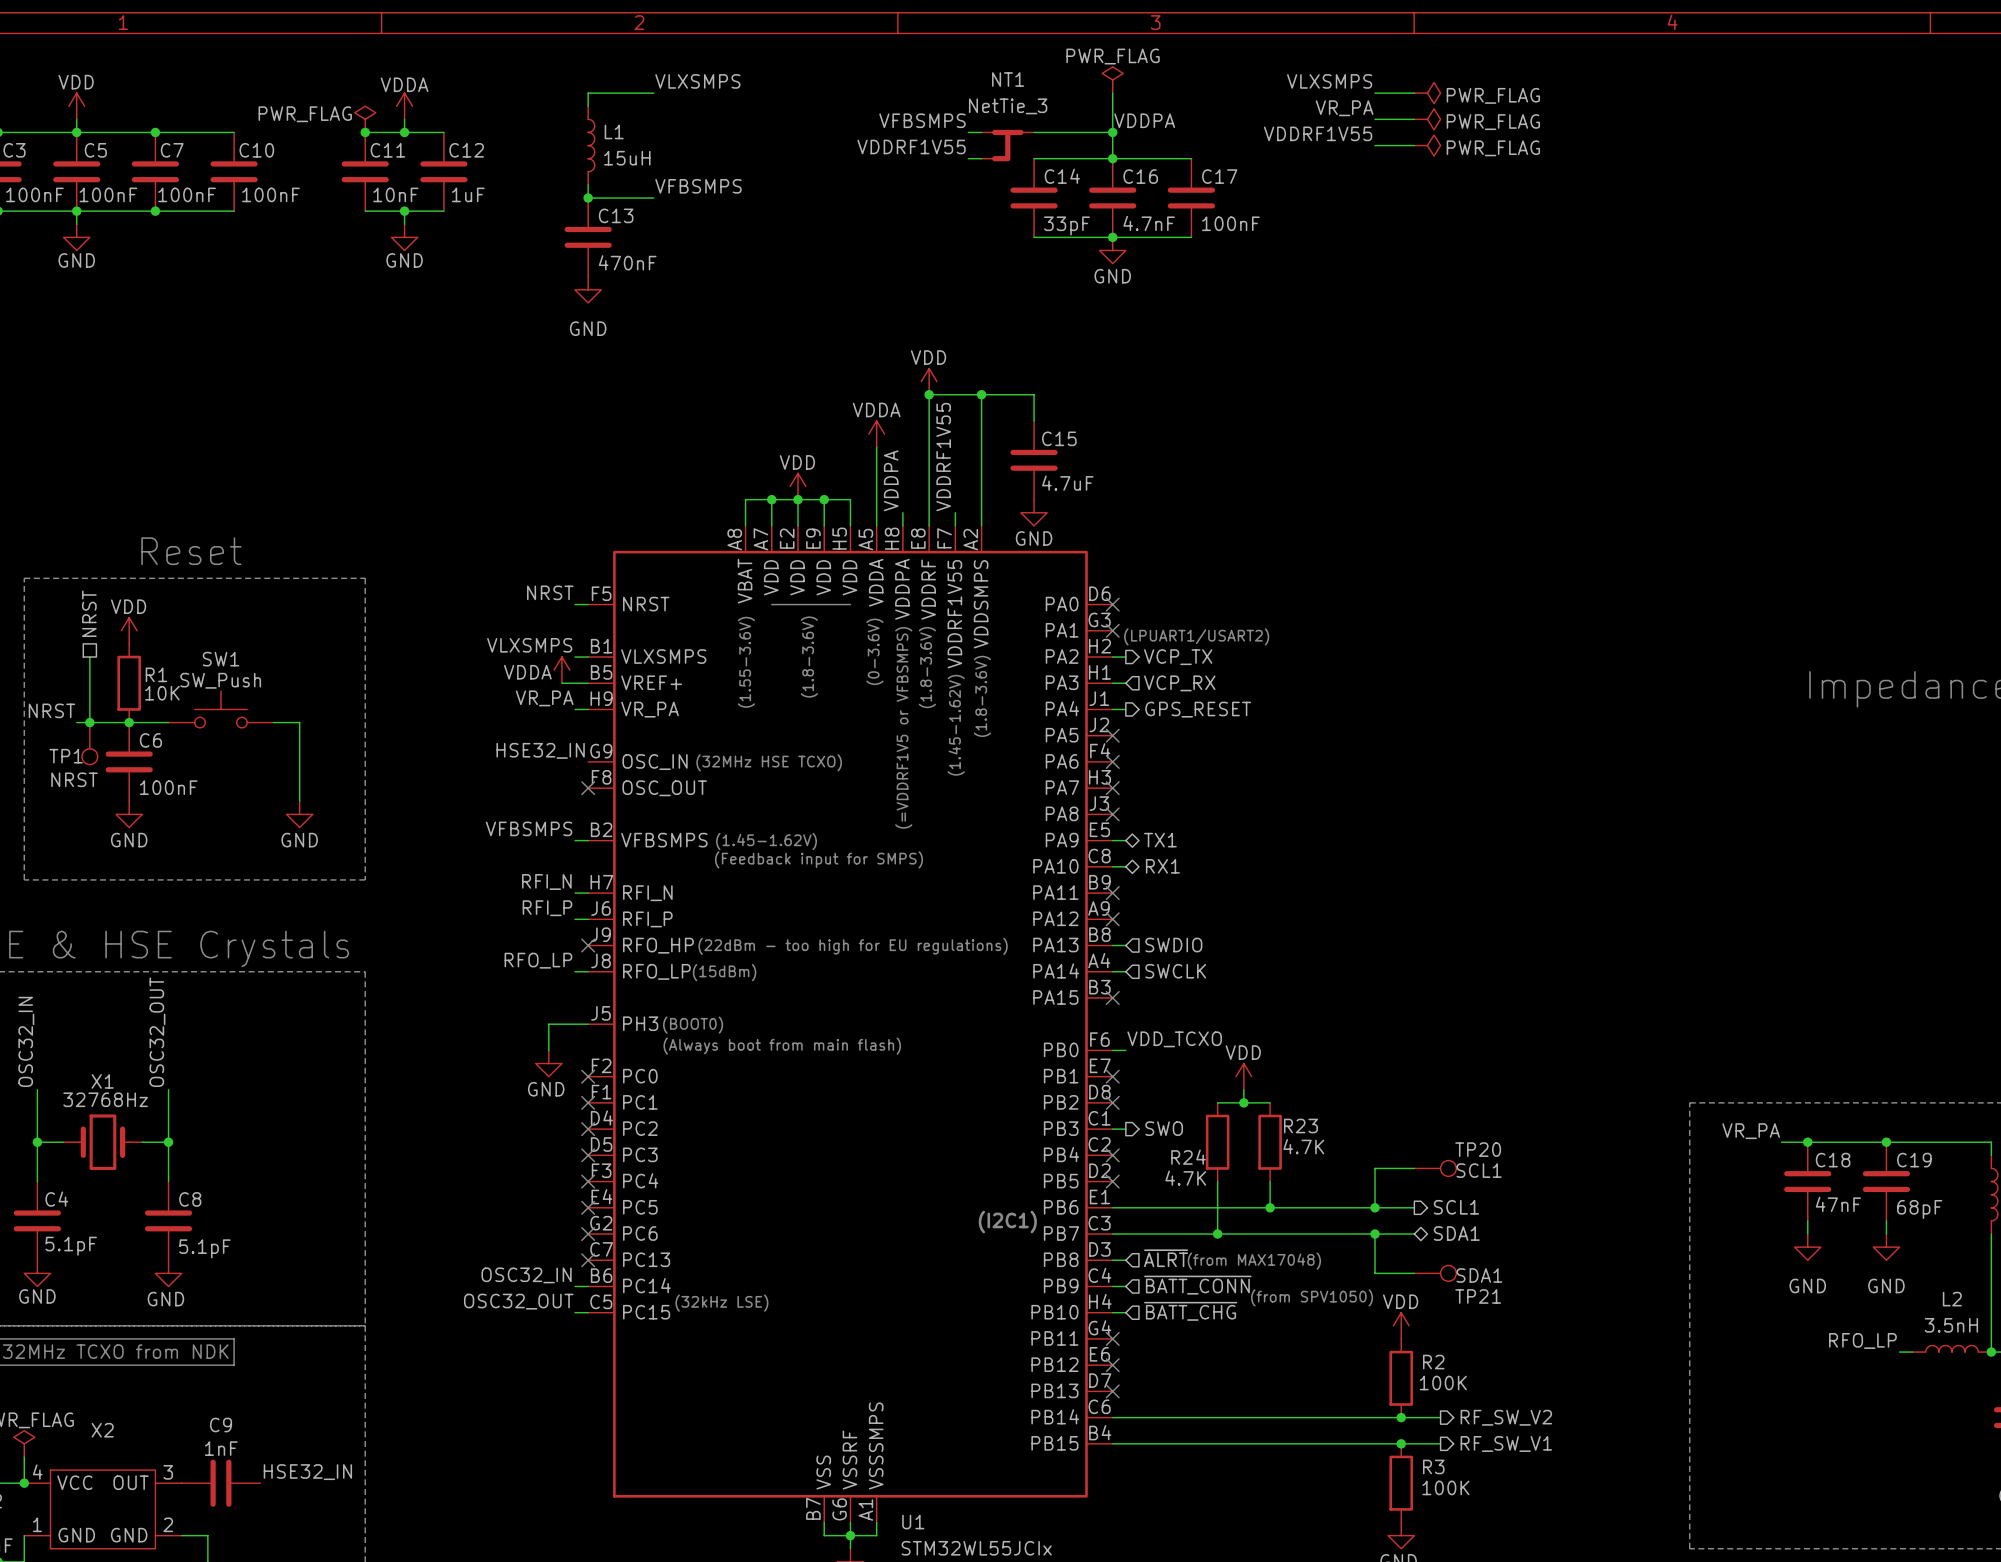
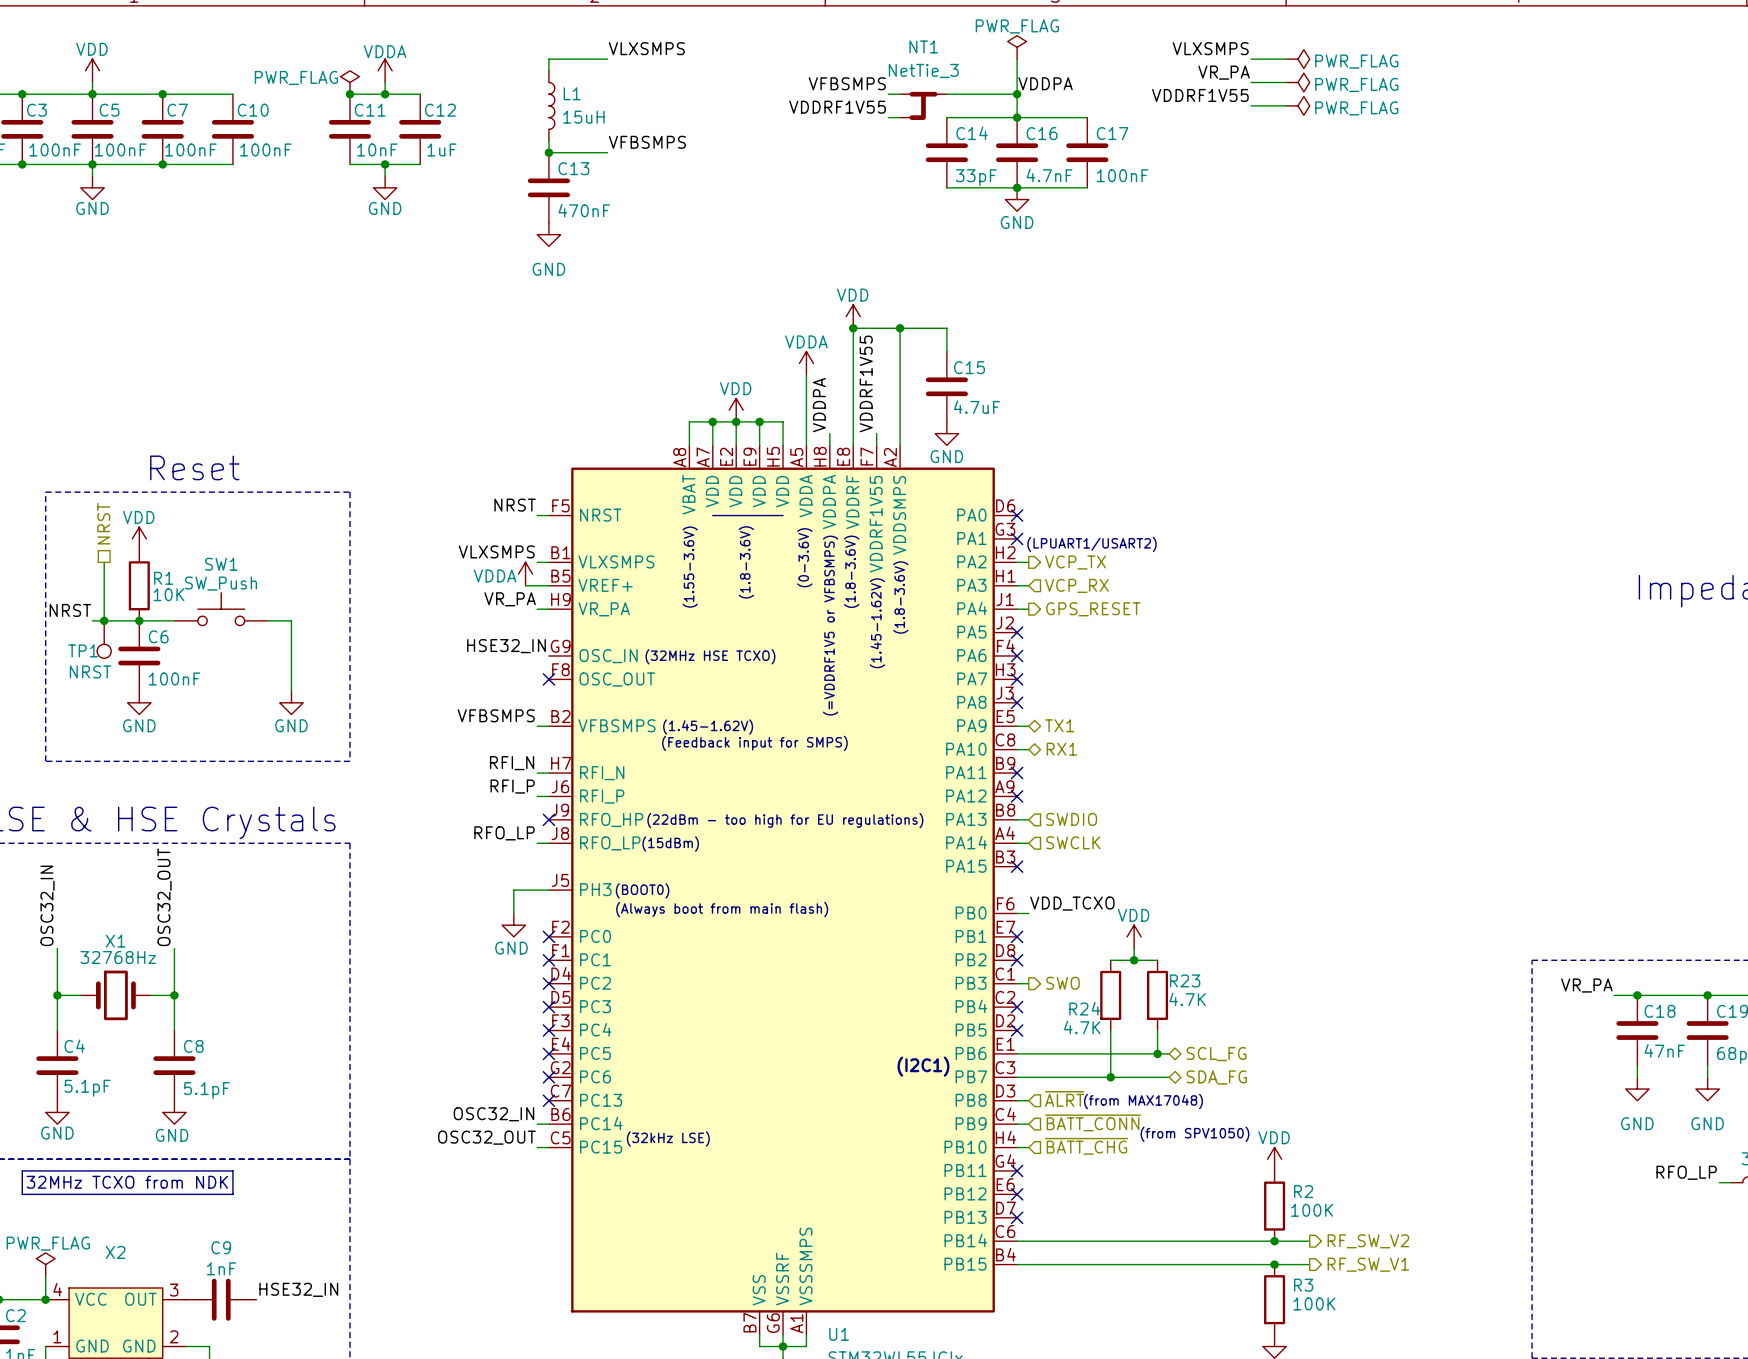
wire: (1414, 1168) (1375, 1168) (1375, 1207) -> none
TP20: SCL1 (1435, 1168) -> none
wire: (1283, 1207) (1414, 1207) -> none
hierarchical label: none -> SCL_FG (1216, 1054)
junction: (1375, 1207) -> none
hierarchical label: SCL1 (1456, 1207) -> none
hierarchical label: SDA1 (1456, 1233) -> none
wire: (1283, 1234) (1414, 1234) -> none
hierarchical label: none -> SDA_FG (1216, 1077)
wire: (1375, 1234) (1375, 1273) (1414, 1273) -> none
junction: (1375, 1234) -> none
TP21: SDA1 (1435, 1273) -> none

